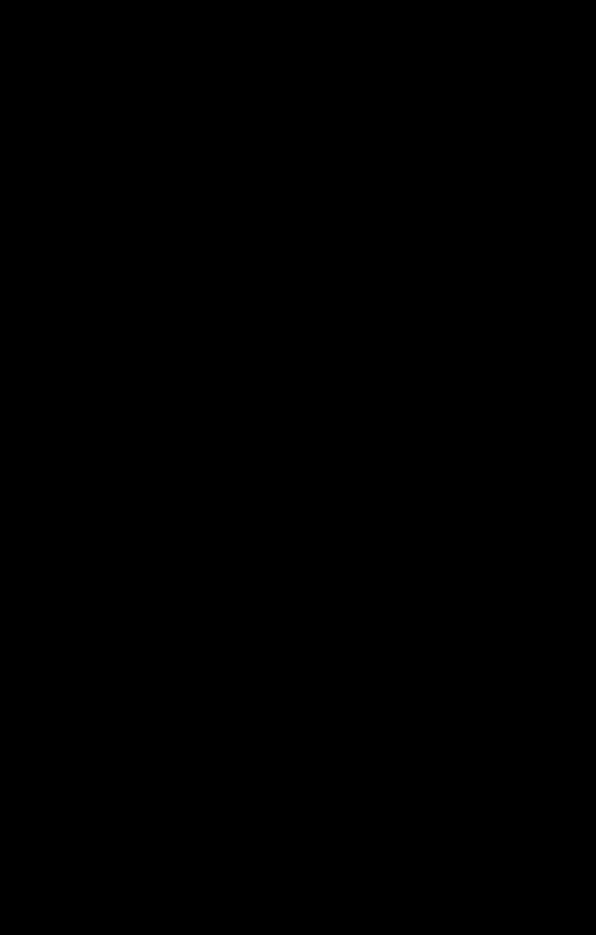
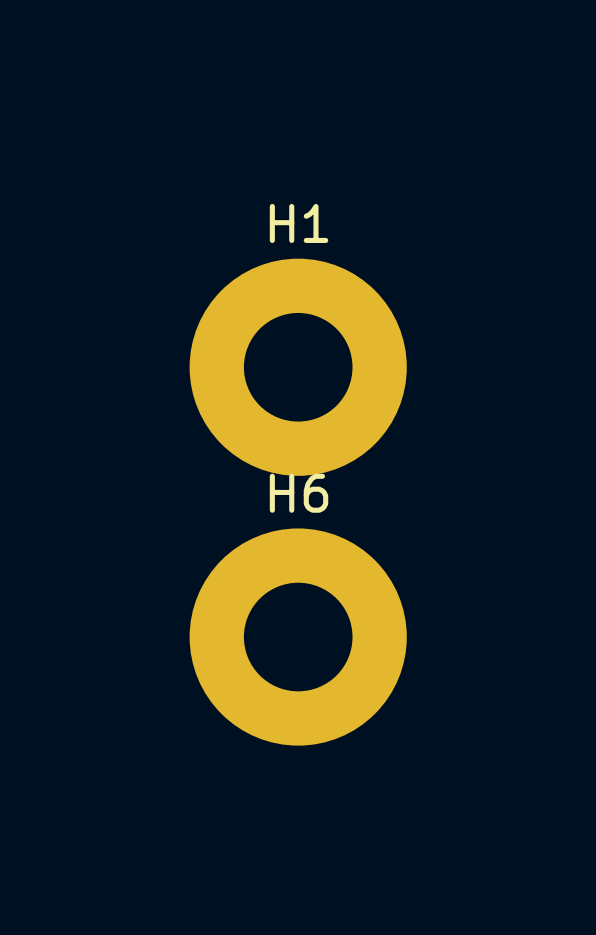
H1: none -> (298, 367)
H6: none -> (298, 637)

